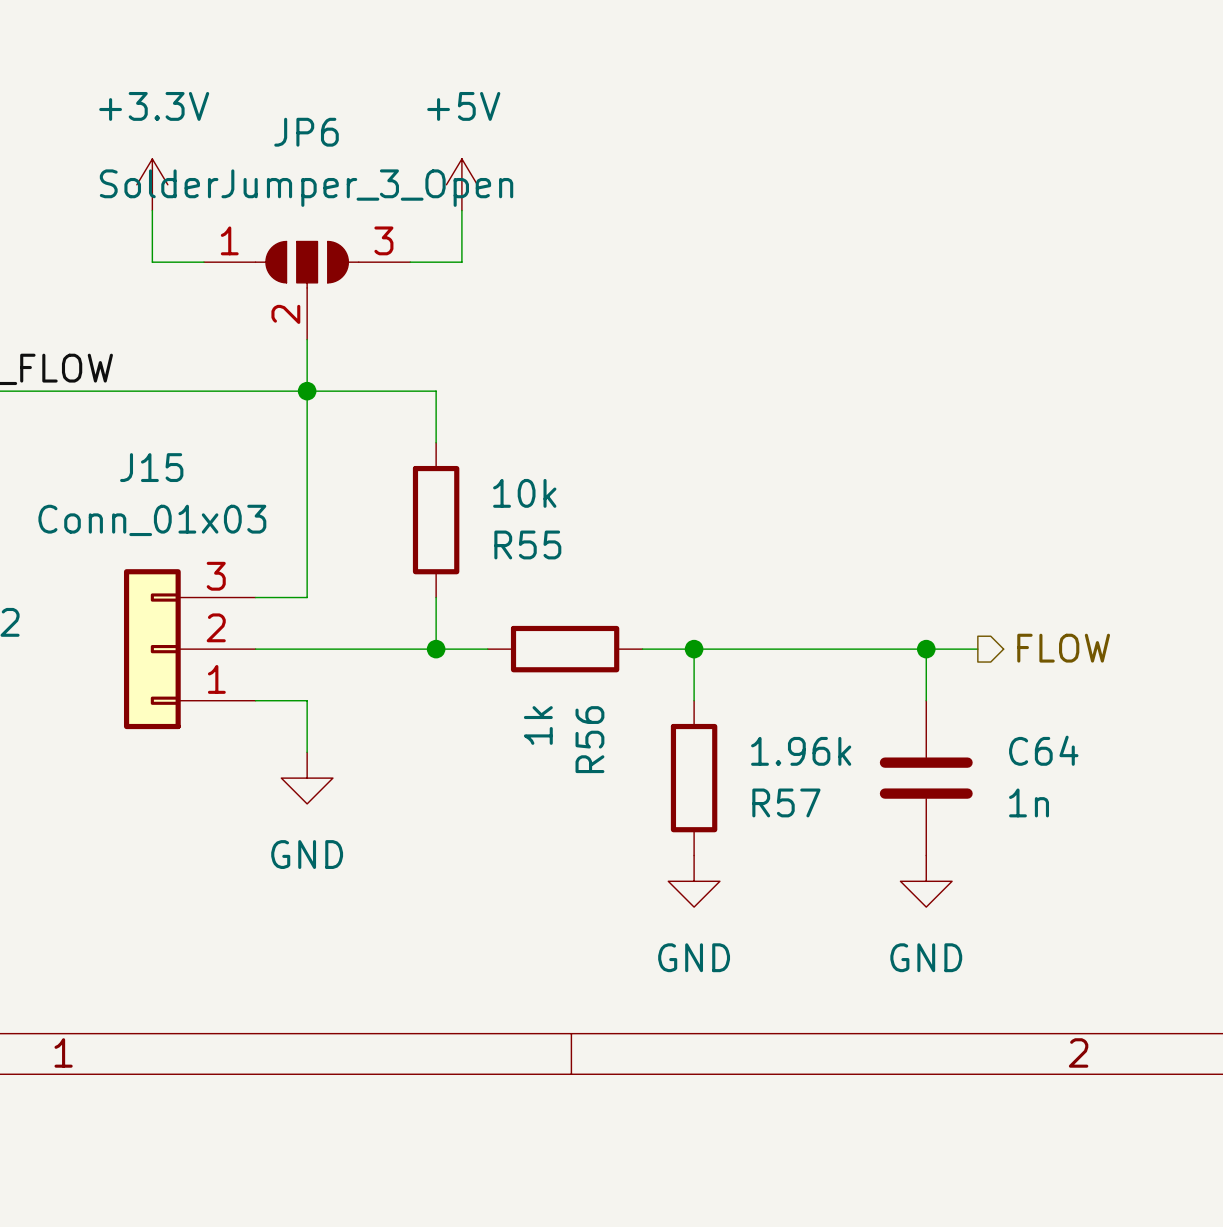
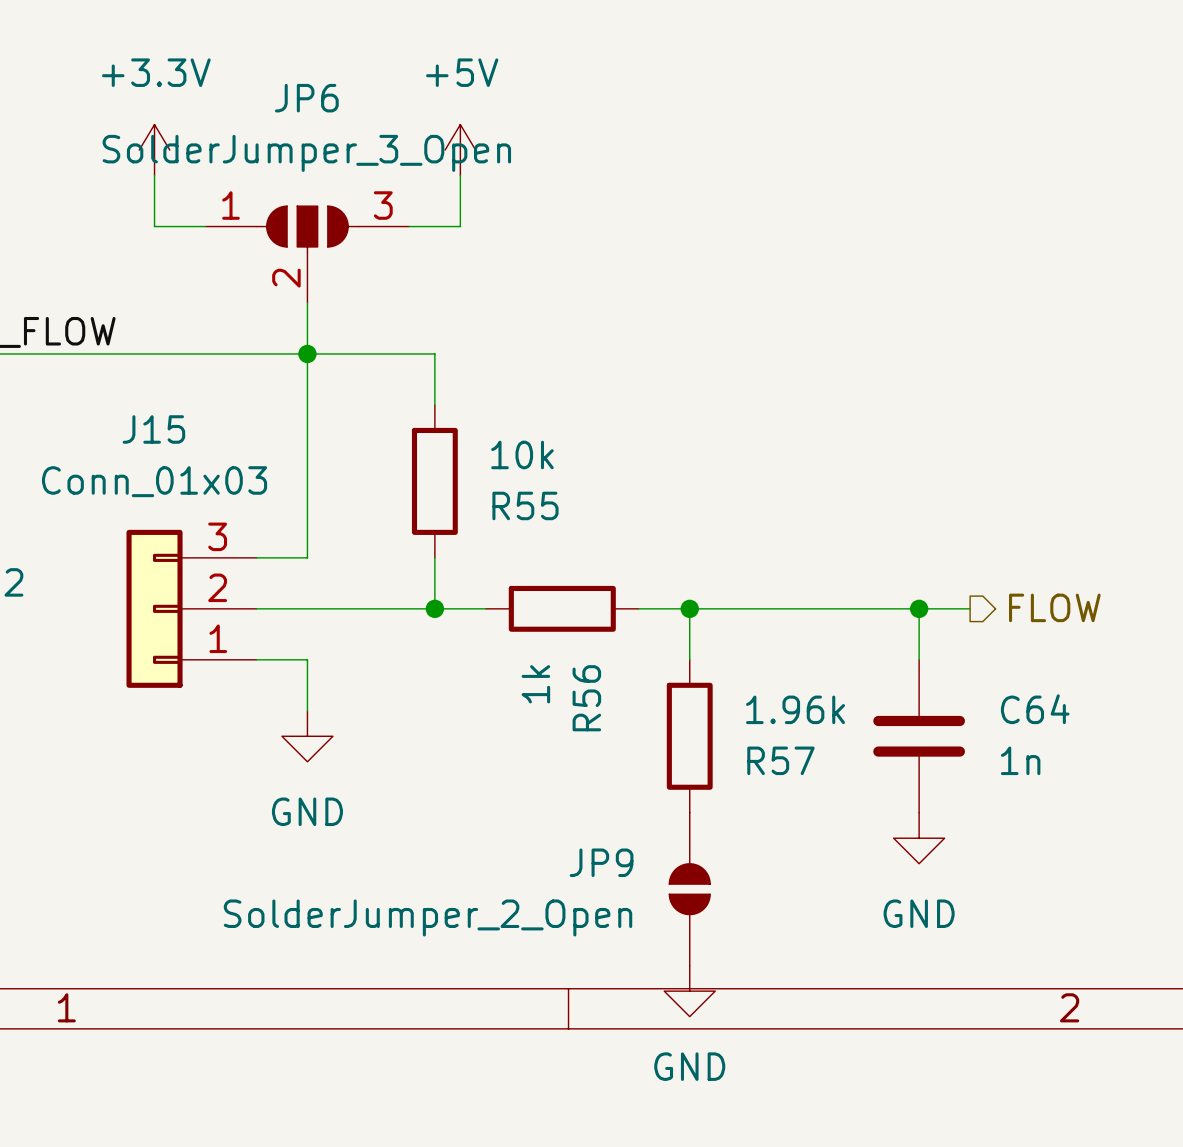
power symbol position: GND (694, 881) -> GND (689, 991)
JP9: none -> SolderJumper_2_Open (689, 889)

